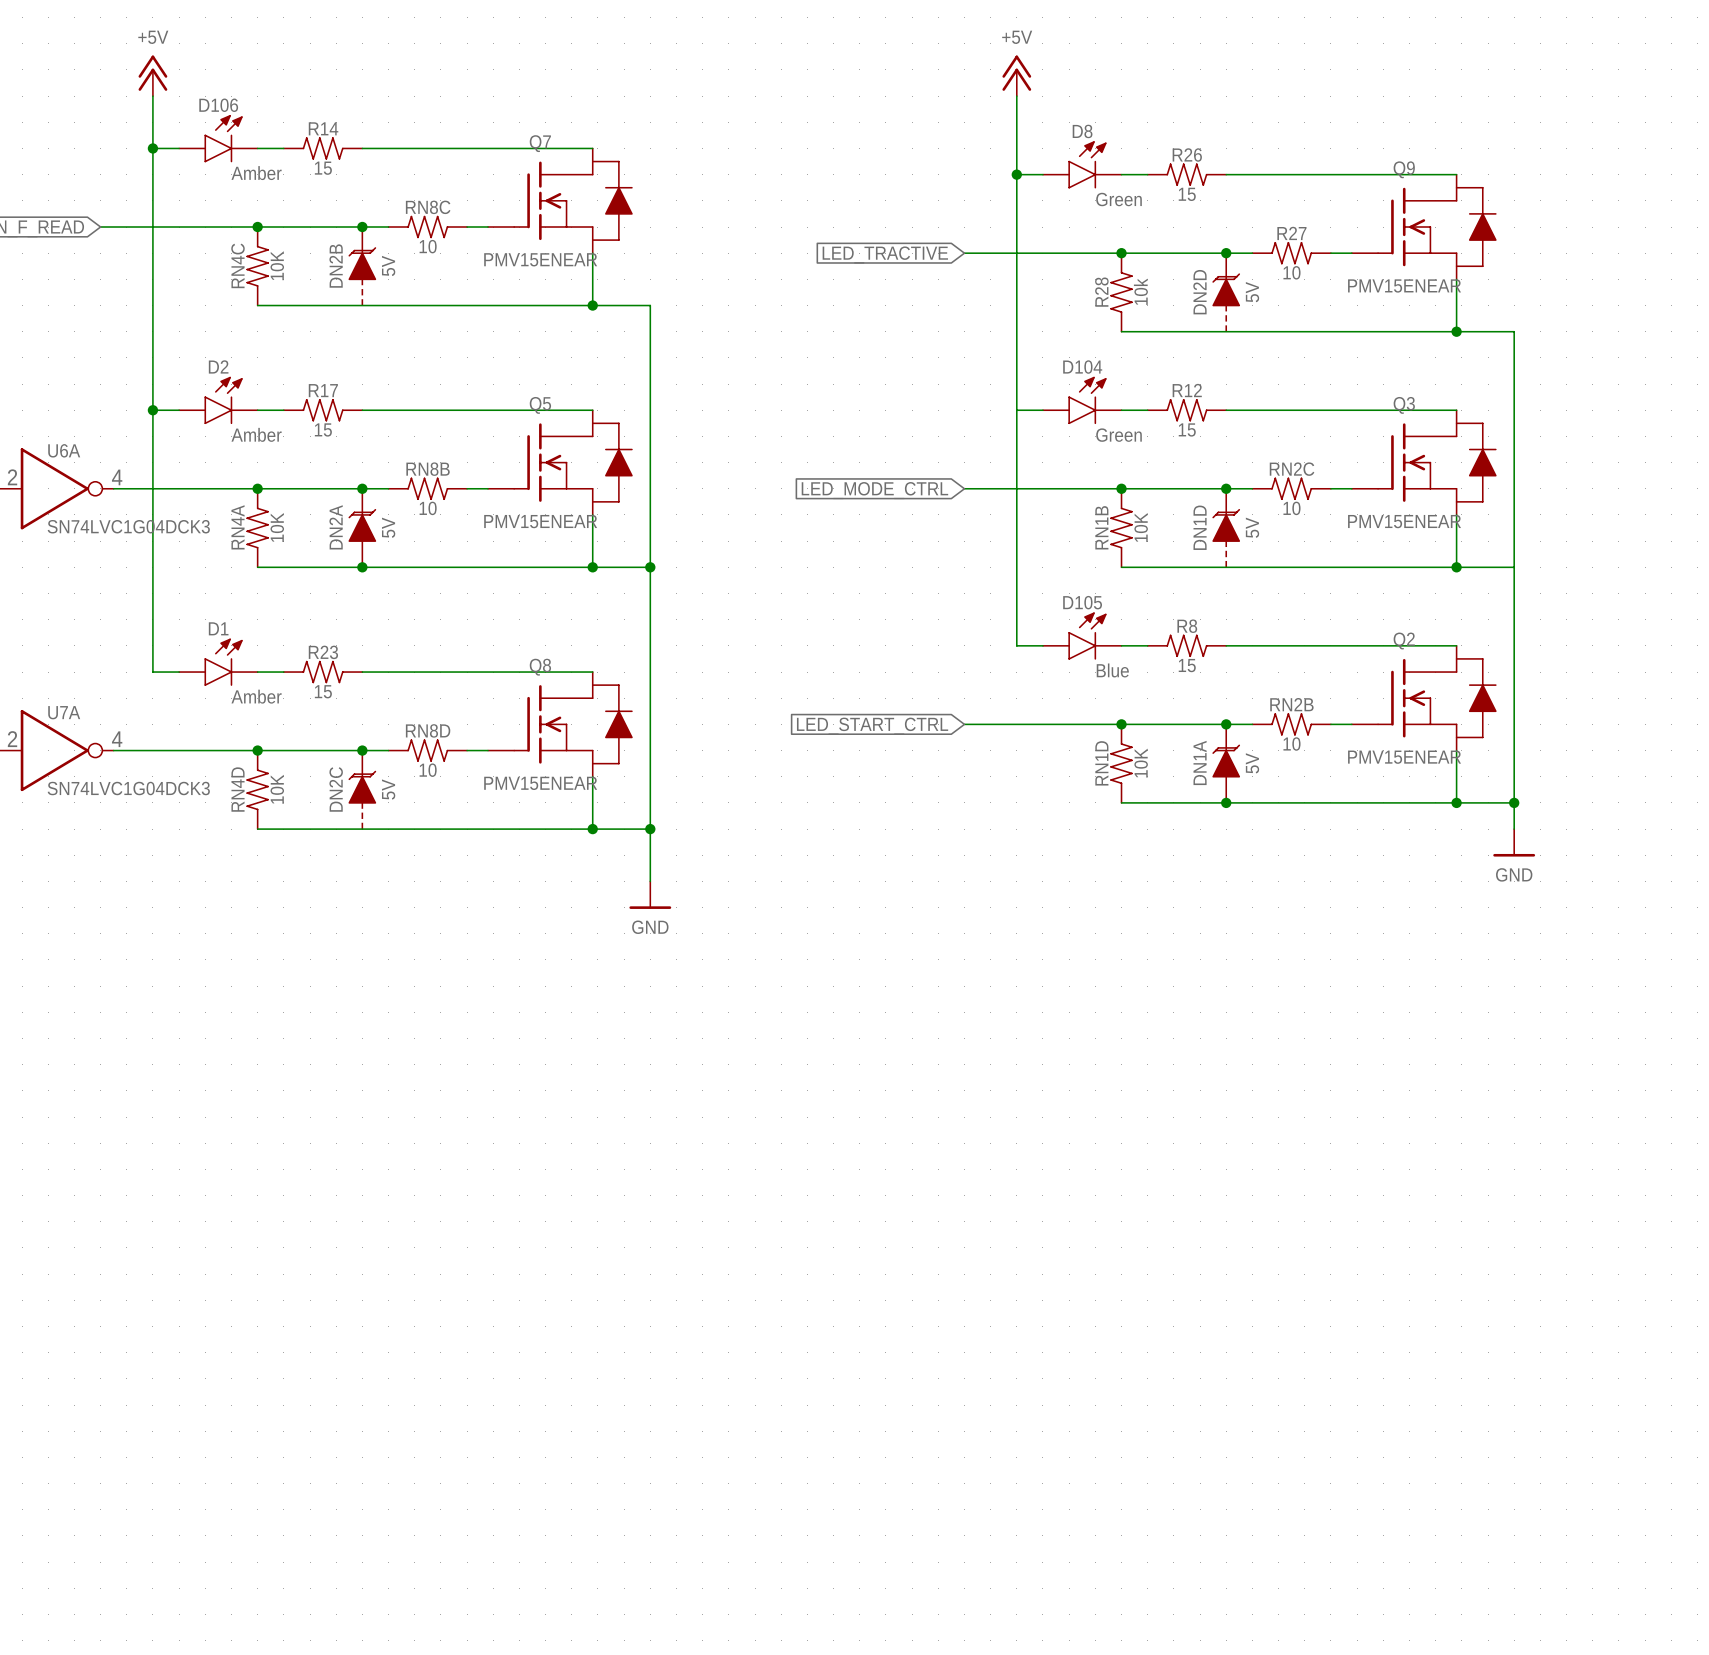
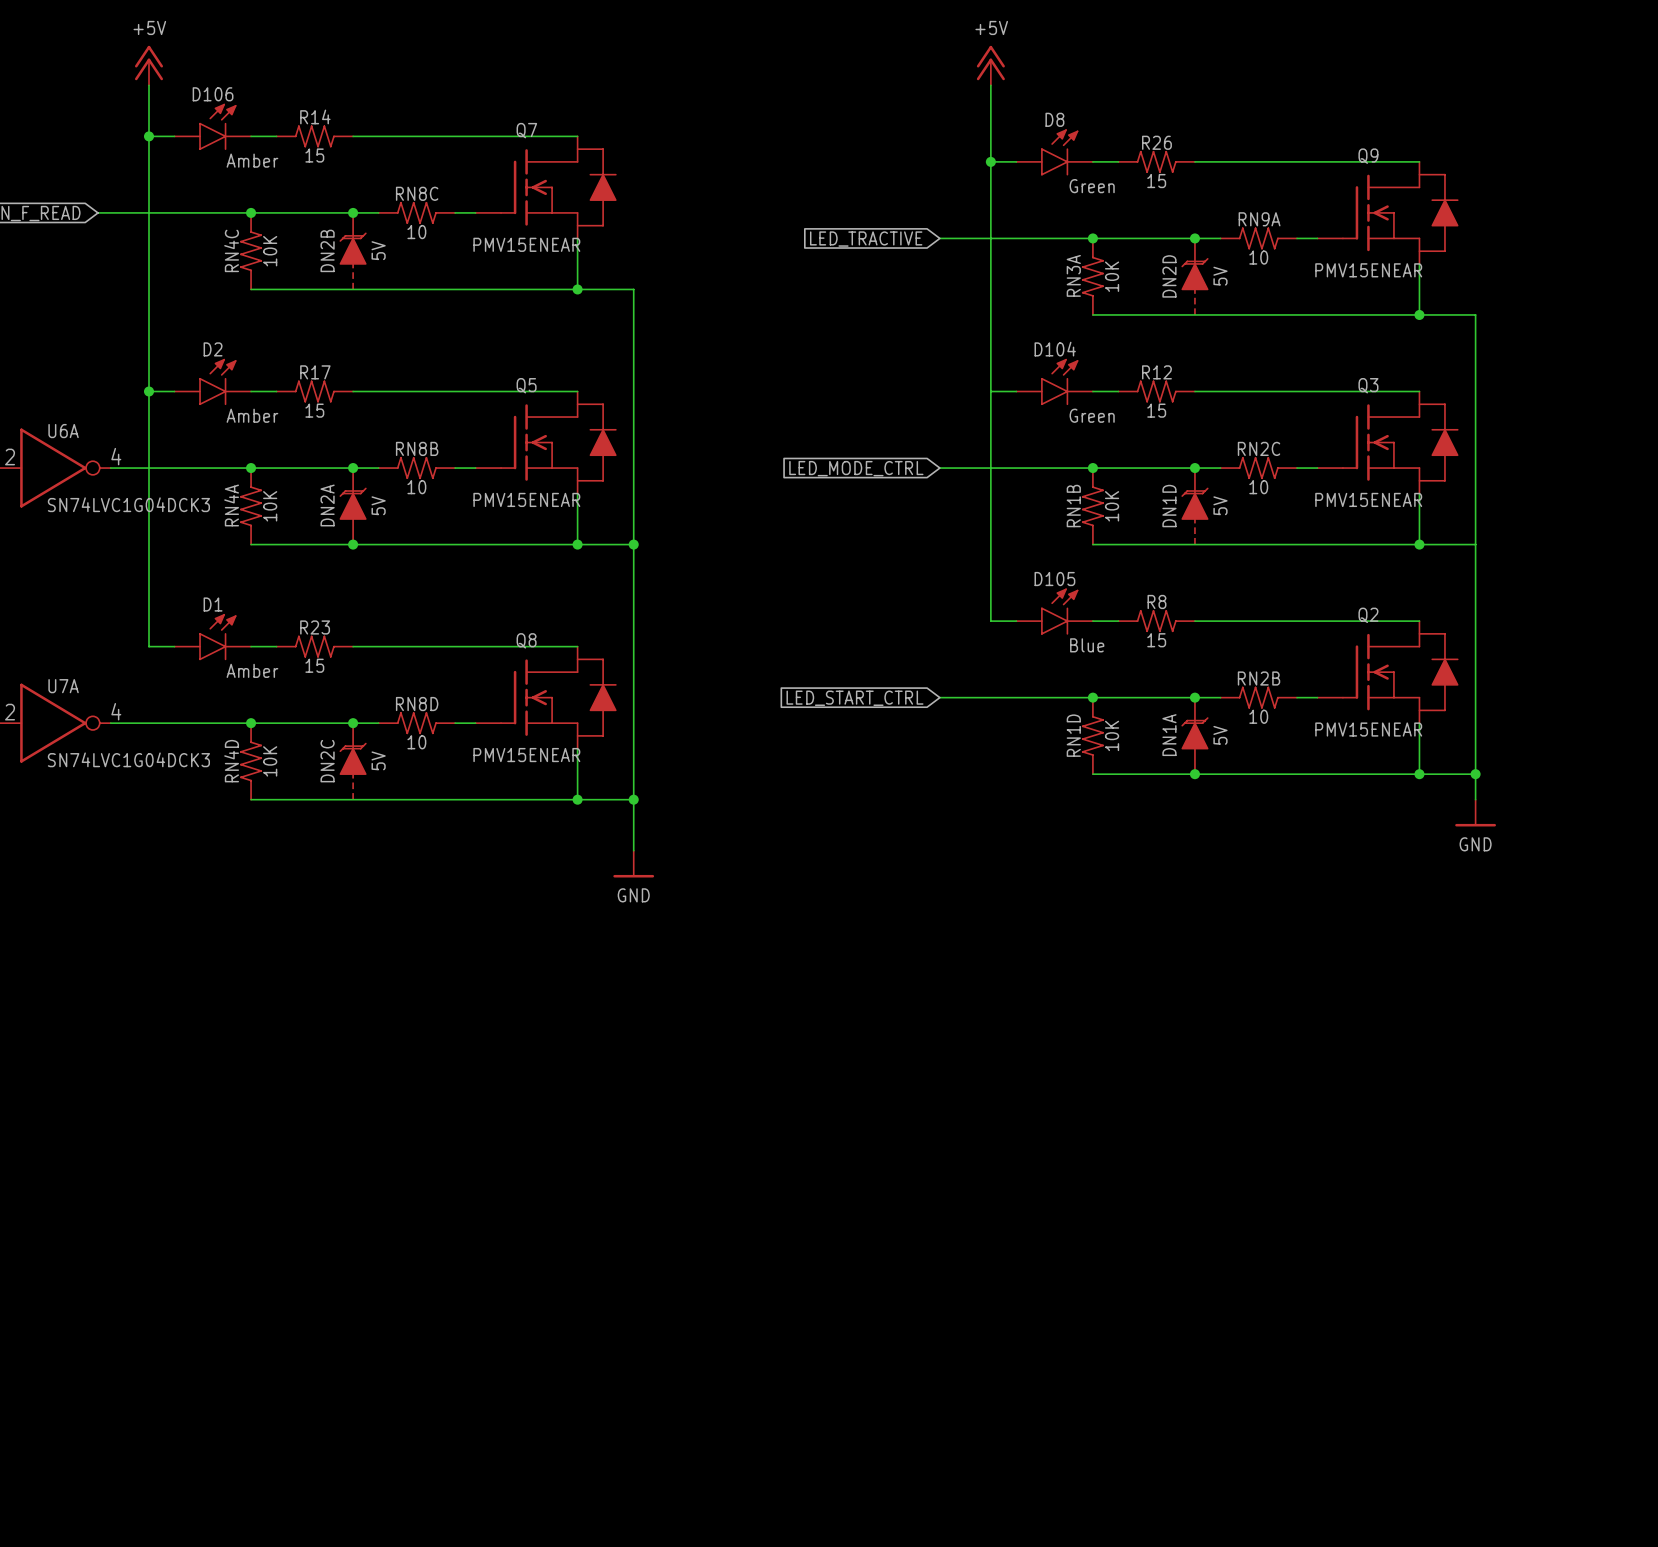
R27 name: R27 (1291, 233) -> RN9A (1259, 219)
R28 text: 10k (1140, 291) -> 10K (1112, 276)
R28 name: R28 (1101, 292) -> RN3A (1073, 275)

